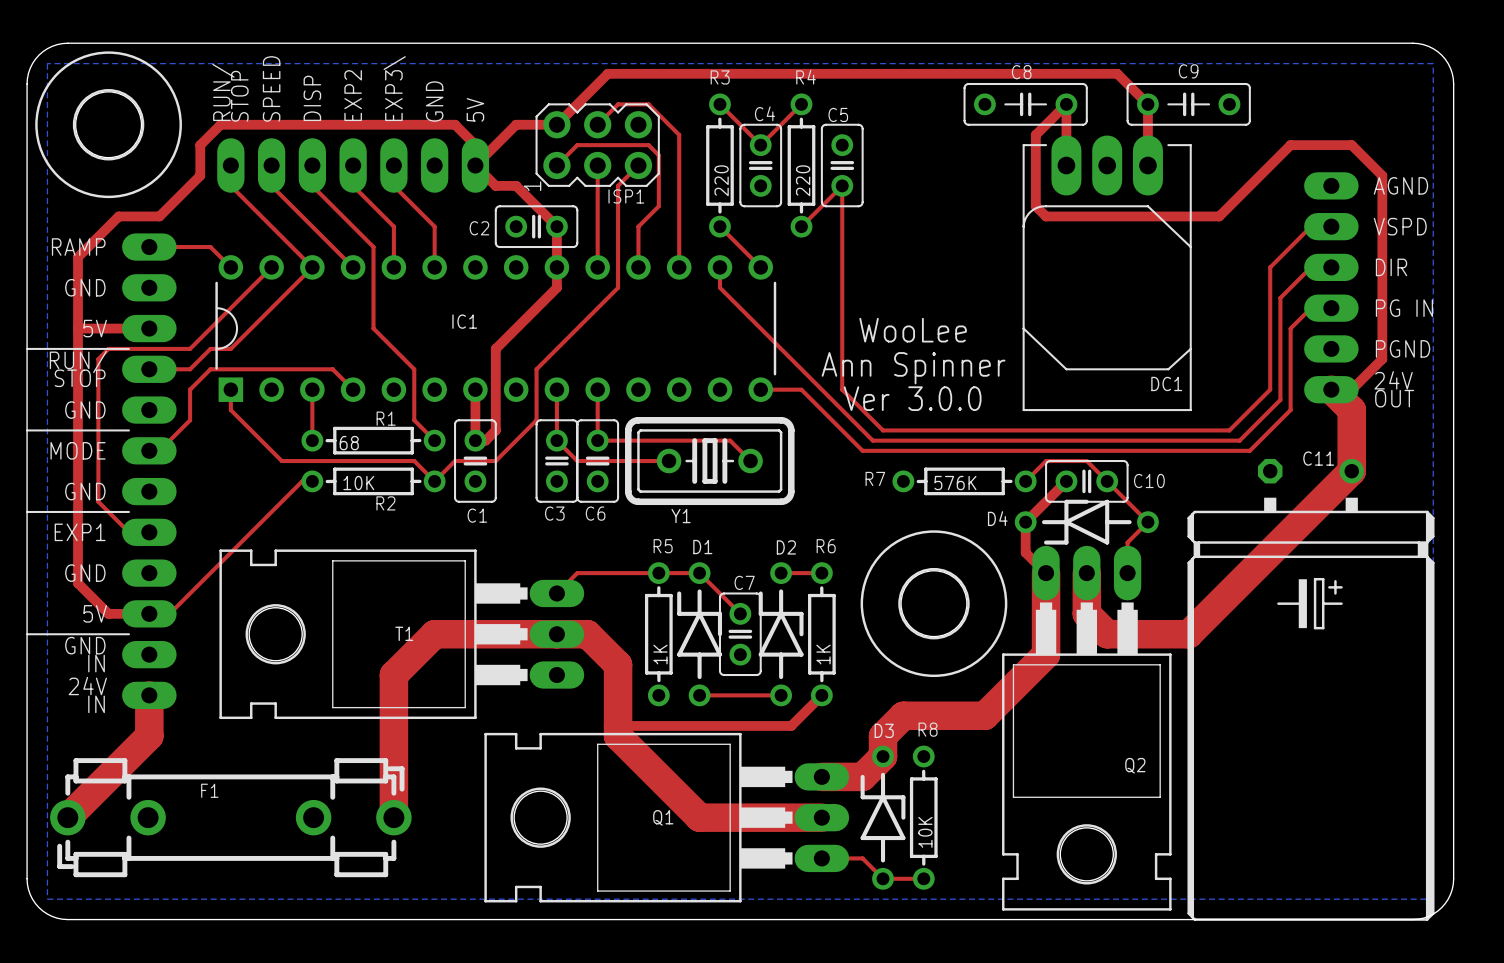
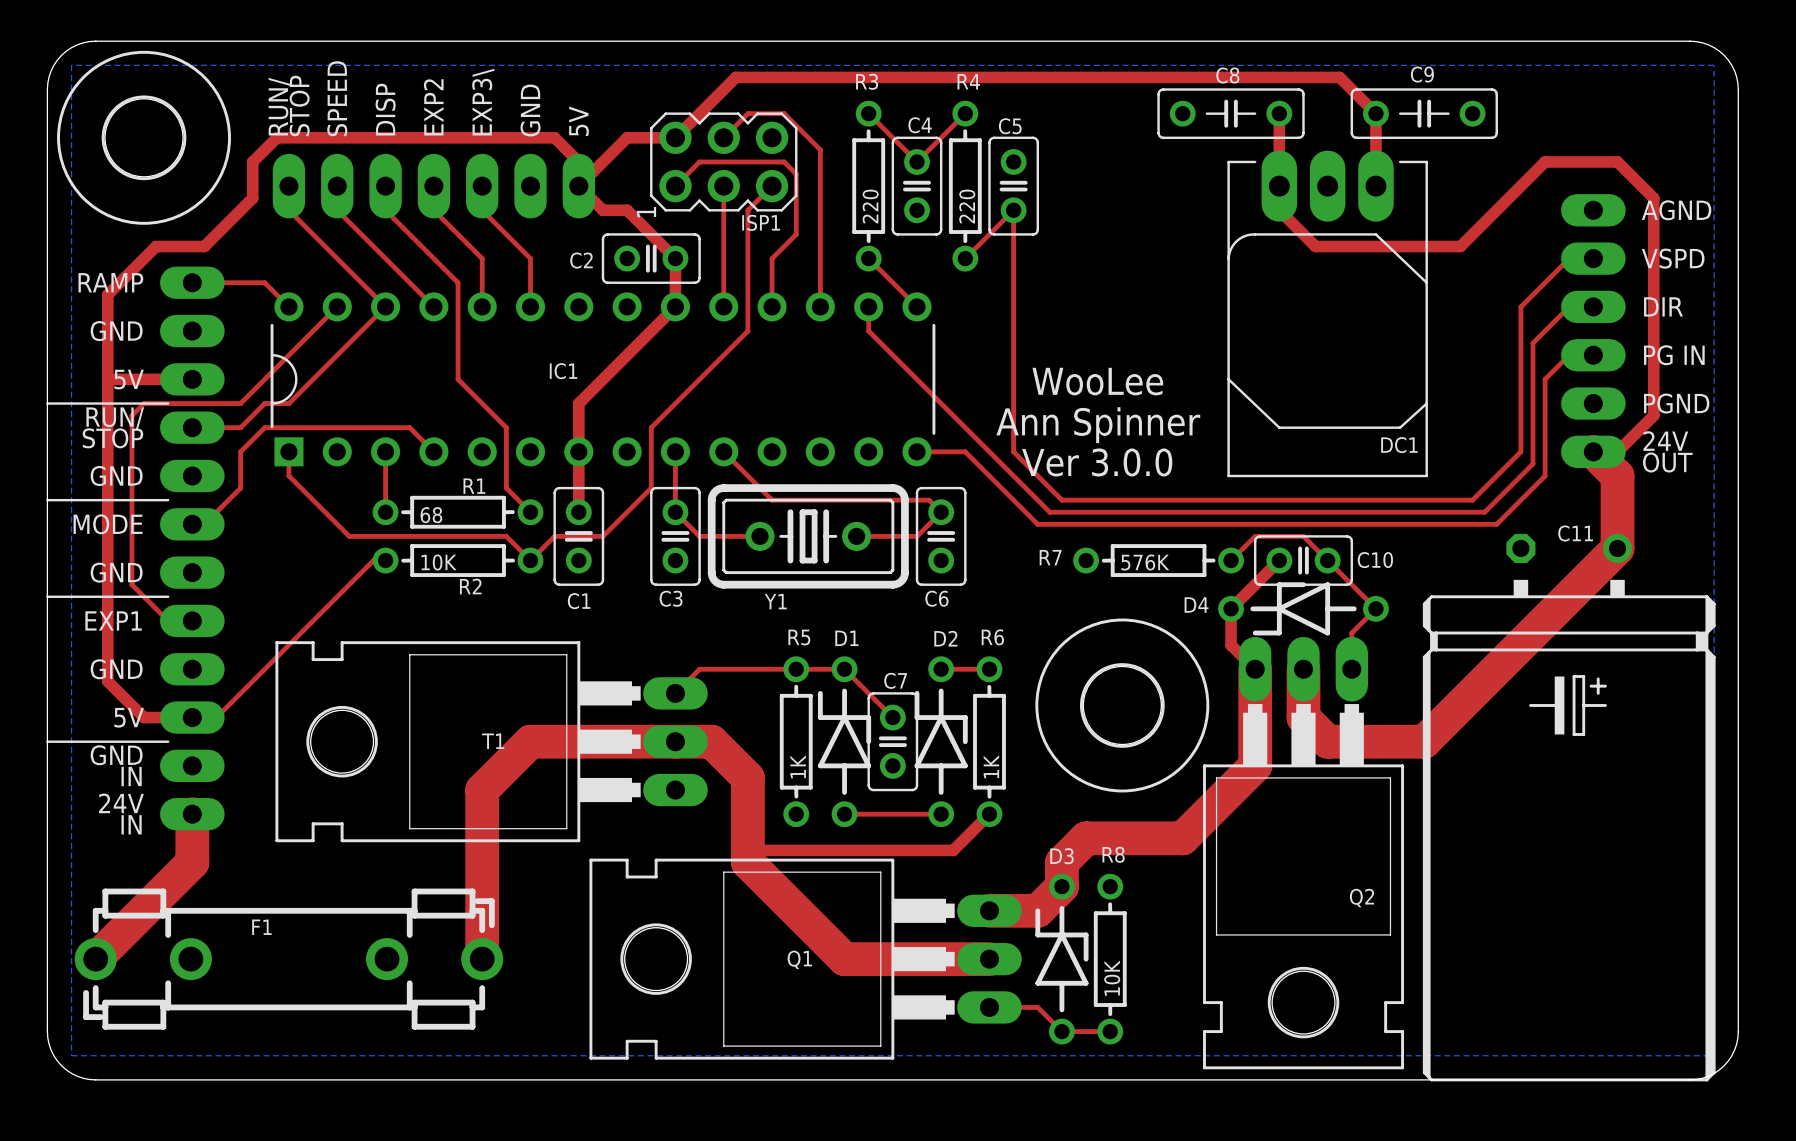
top track: (1066, 104) (1035, 134) (1035, 206) (1046, 216) (1097, 216) -> (1279, 186) (1279, 210) (1315, 246)
top track: (556, 267) (556, 287) (495, 348) (495, 430) (485, 440) (475, 440) -> (675, 306) (578, 403) (578, 451)
top track: (597, 389) (597, 440) (730, 440) (750, 461) -> (723, 451) (772, 500) (929, 500) (941, 512) (917, 536) (856, 536)
C6 position: (597, 461) -> (941, 536)
top track: (628, 461) (669, 461) -> none
Y1 position: (709, 461) -> (808, 536)

